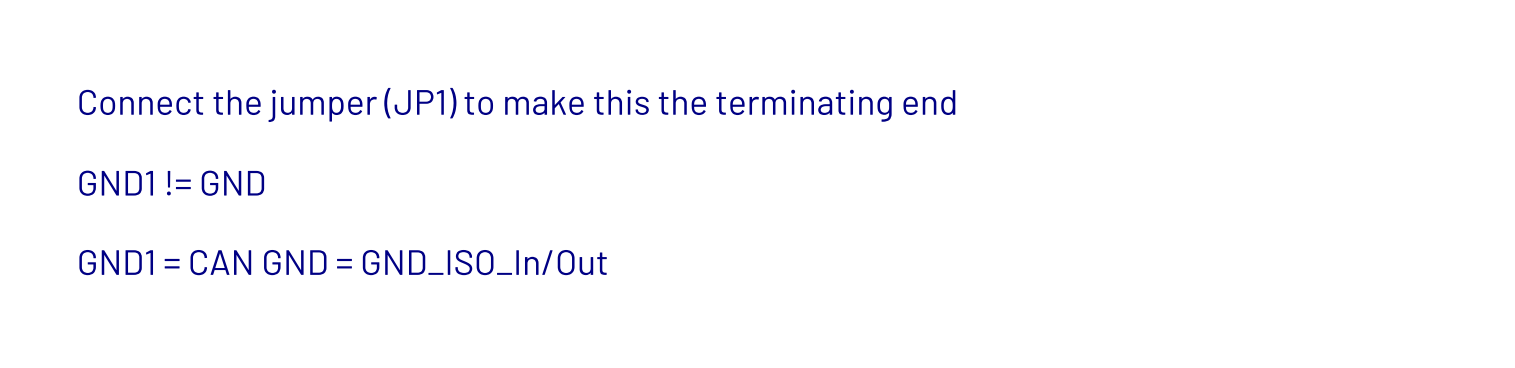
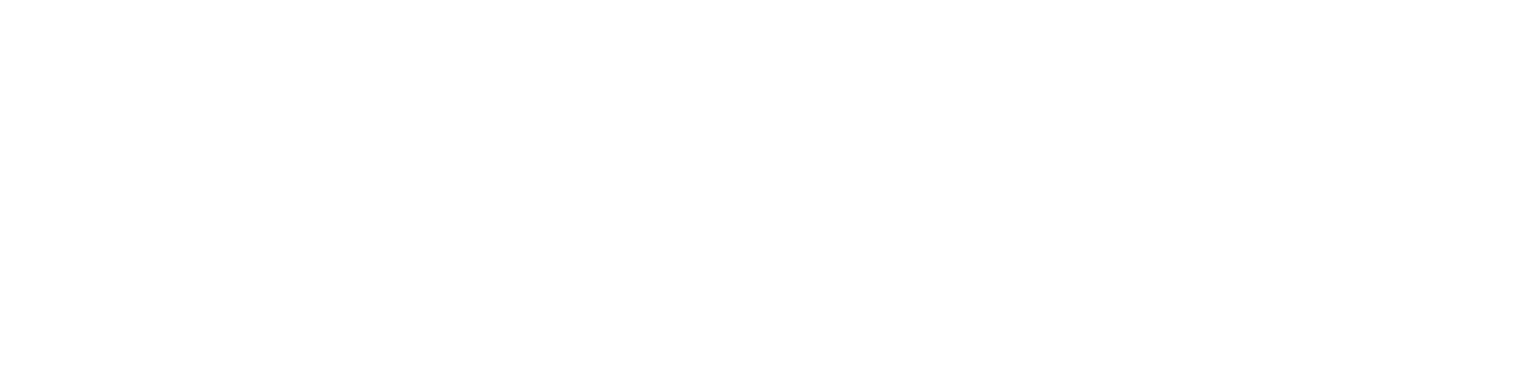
text: Connect the jumper (JP1) to make this the terminating end (517, 104) -> none
text: GND1 != GND (171, 183) -> none
text: GND1 = CAN GND = GND_ISO_In/Out (343, 262) -> none

